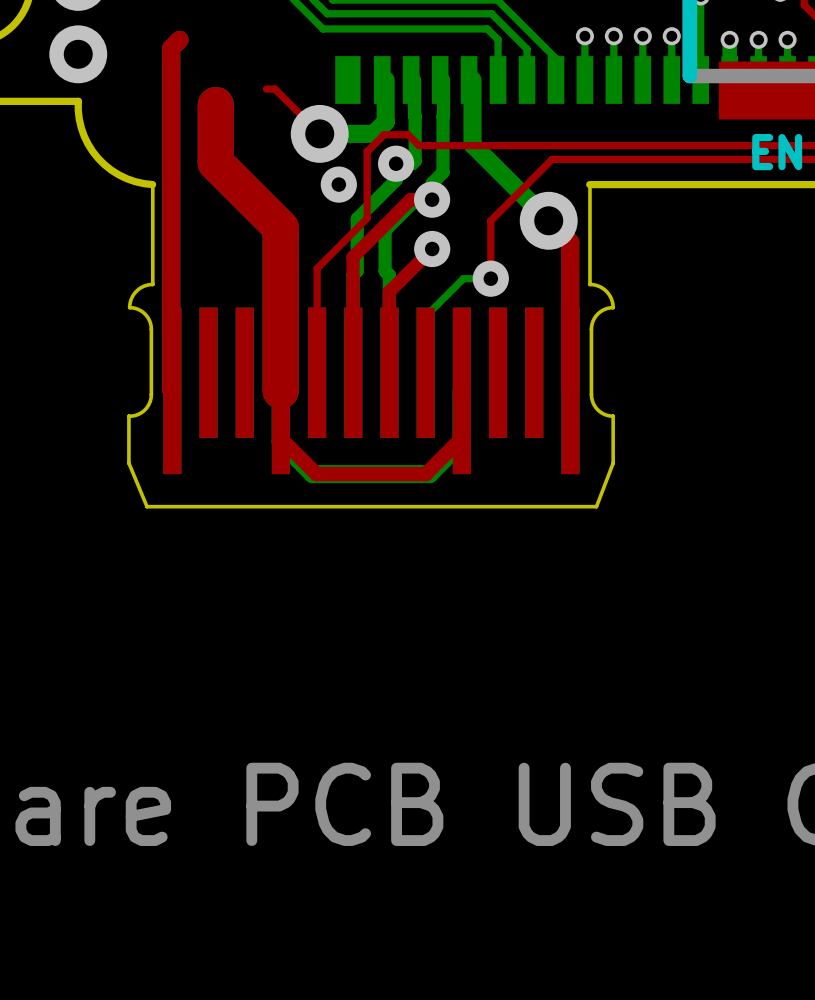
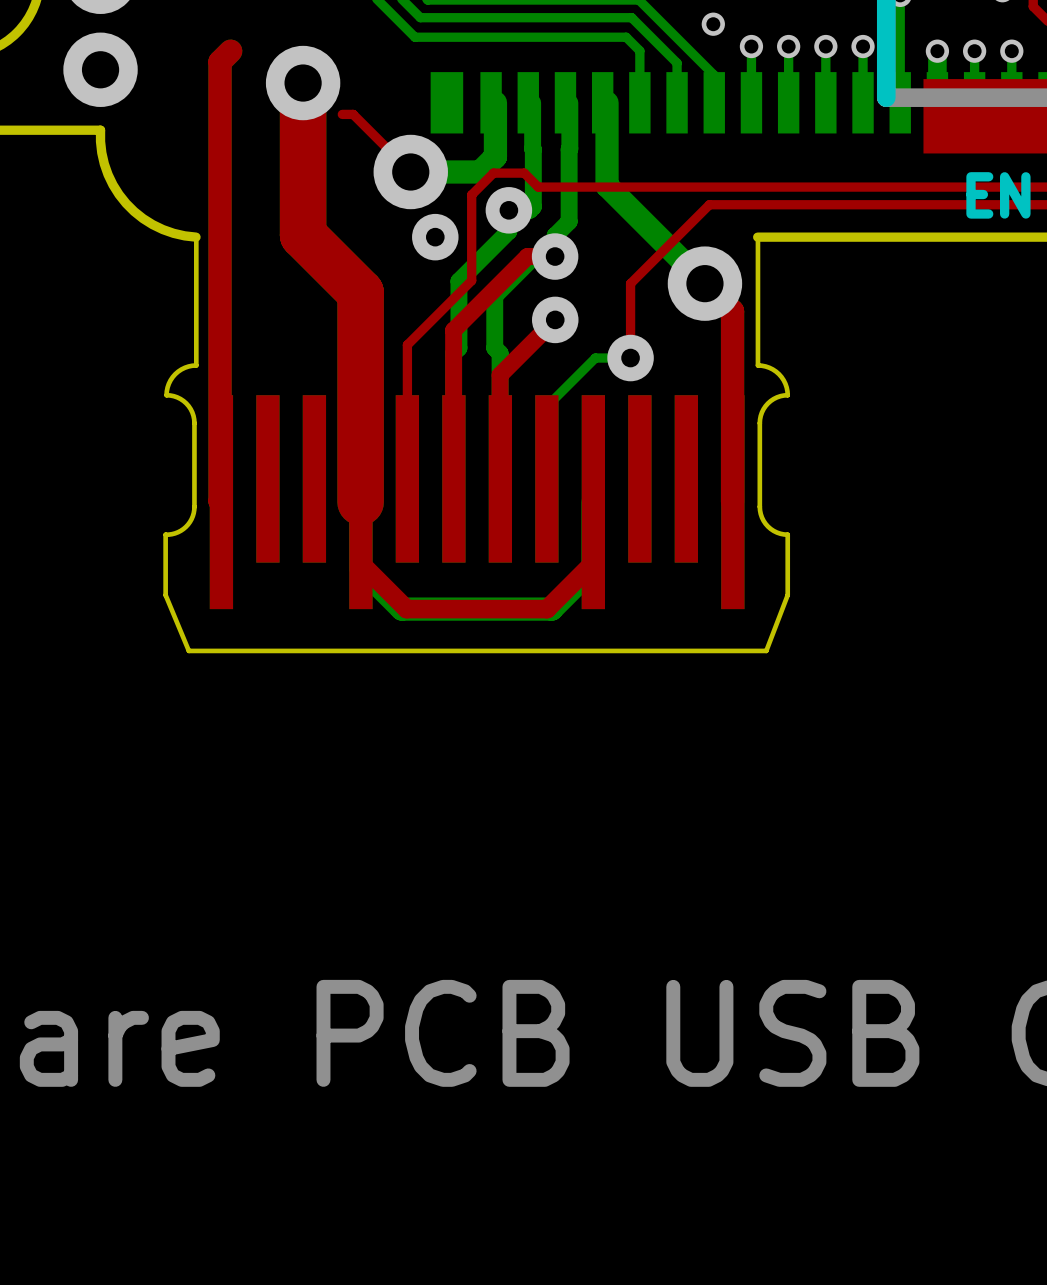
via: none -> (713, 24)
via: none -> (303, 83)
top track: (215, 104) (215, 162) (235, 183) -> (303, 83) (303, 235)

